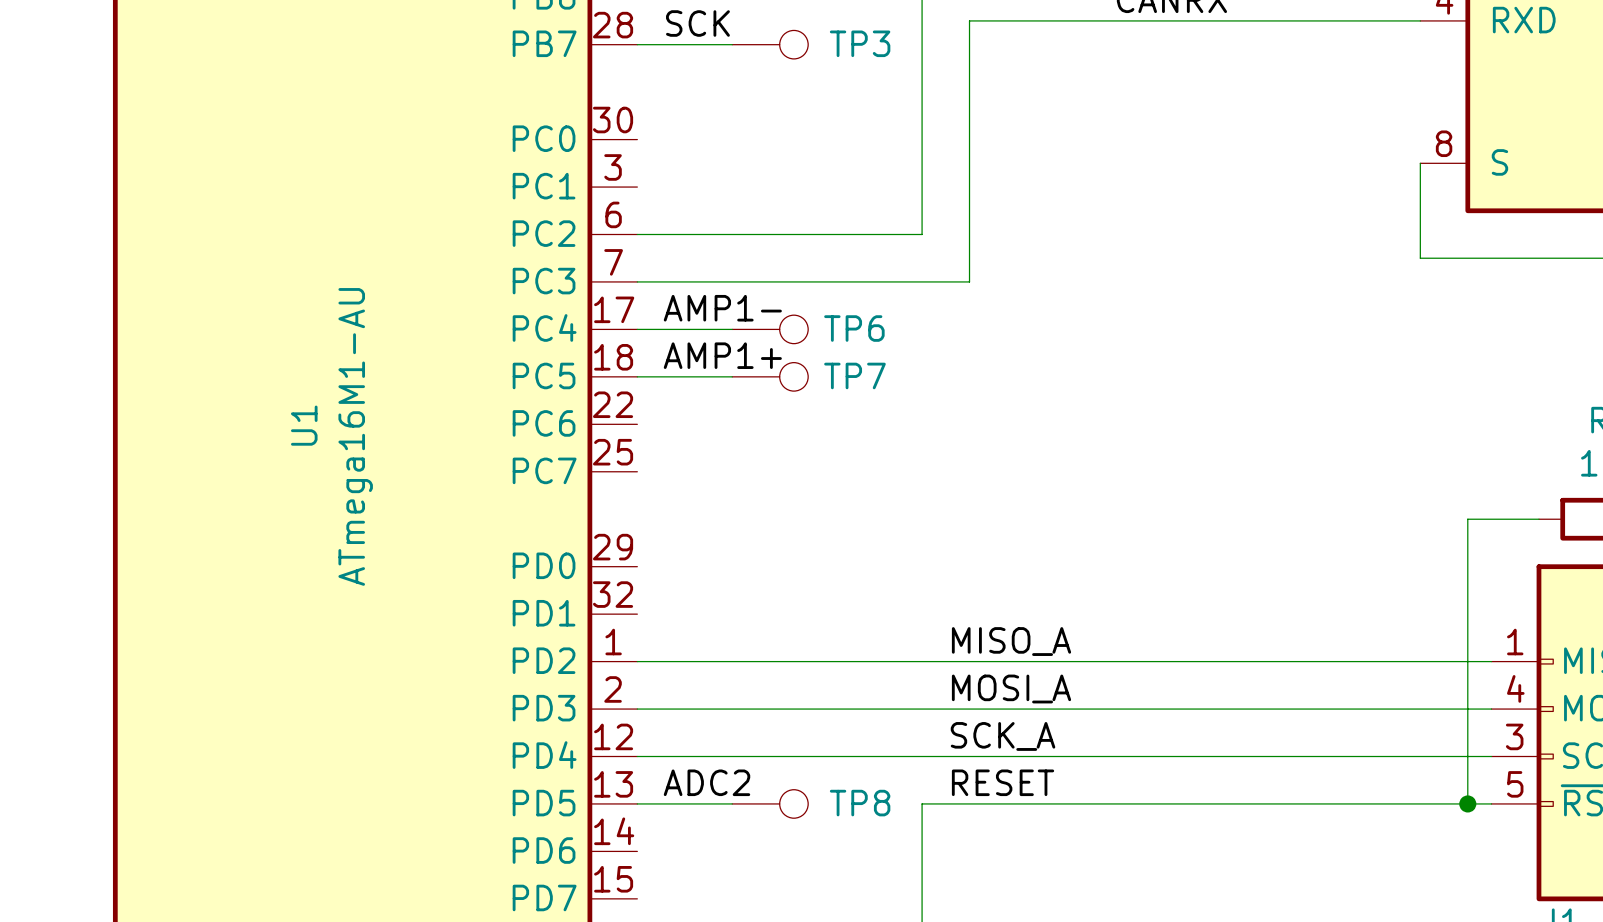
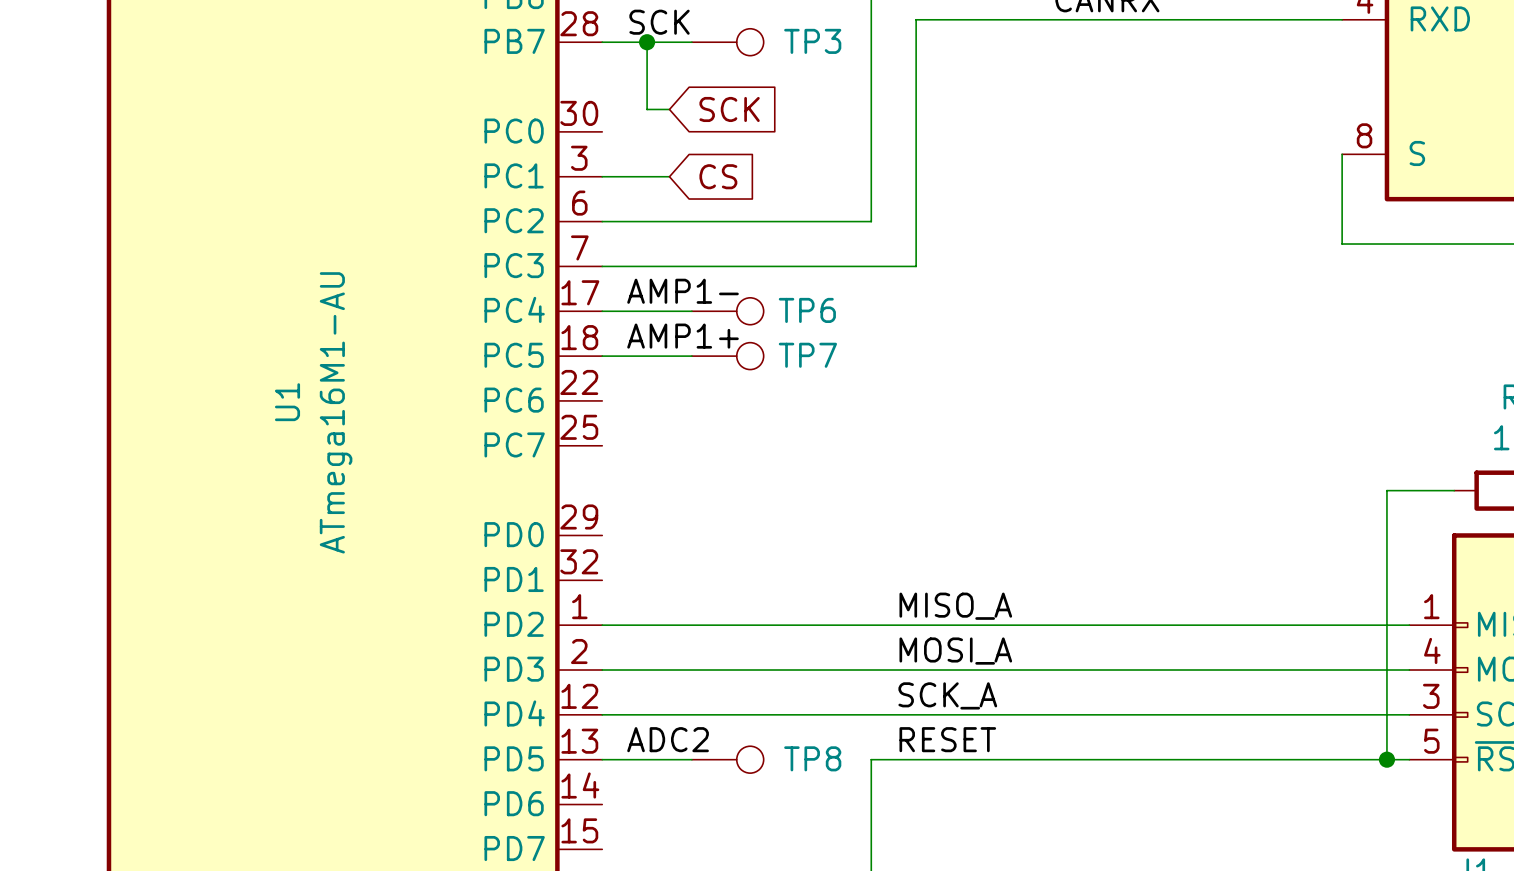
wire: none -> (647, 42) (647, 109) (669, 109)
junction: none -> (647, 42)
global label: none -> SCK (729, 109)
wire: none -> (602, 176) (669, 176)
global label: none -> CS (718, 176)

